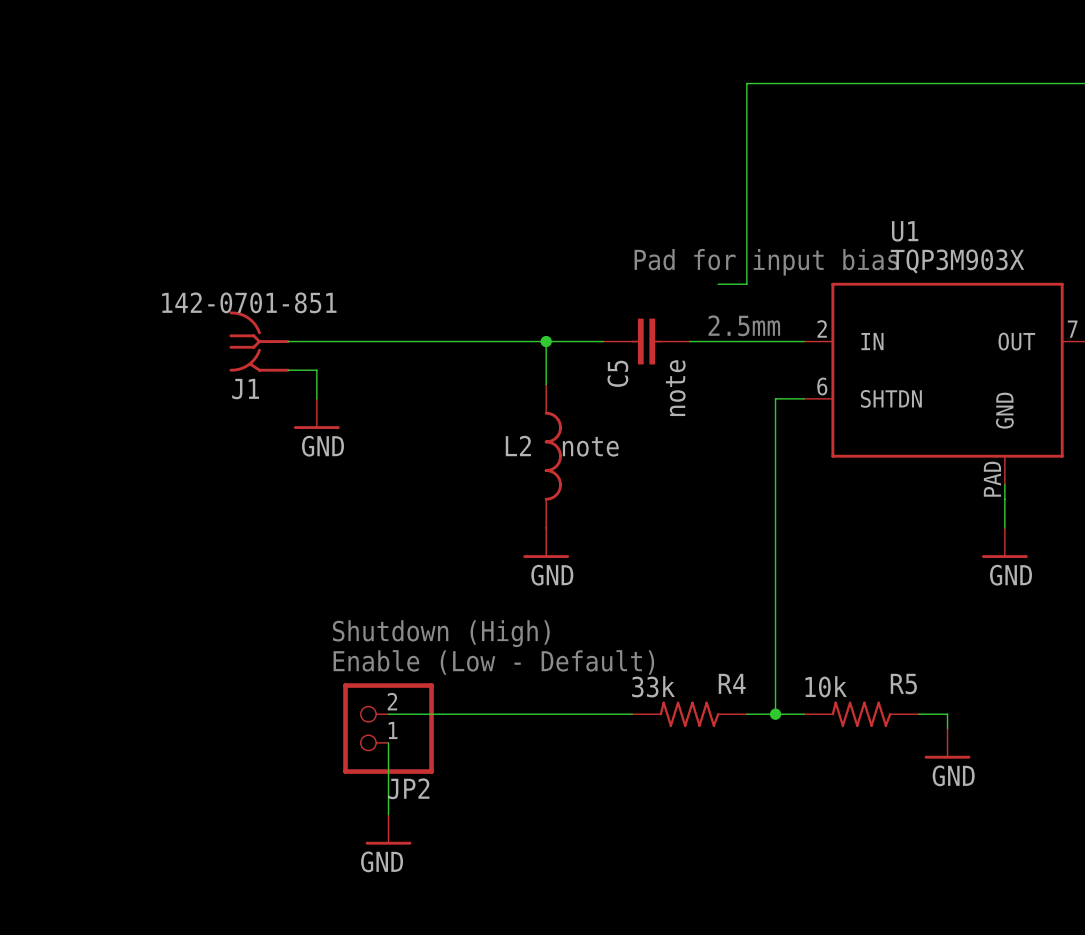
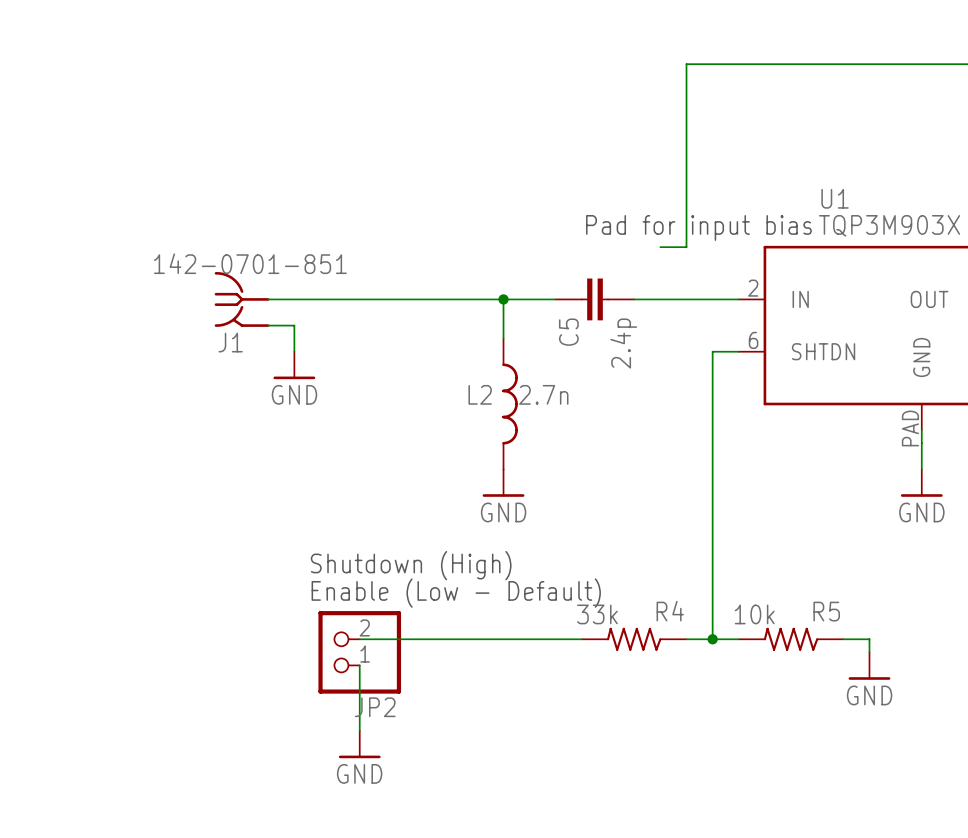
text: 2.5mm (744, 325) -> none
C5 value: note (675, 388) -> 2.4p (623, 343)
L2 value: note (590, 446) -> 2.7n (543, 394)

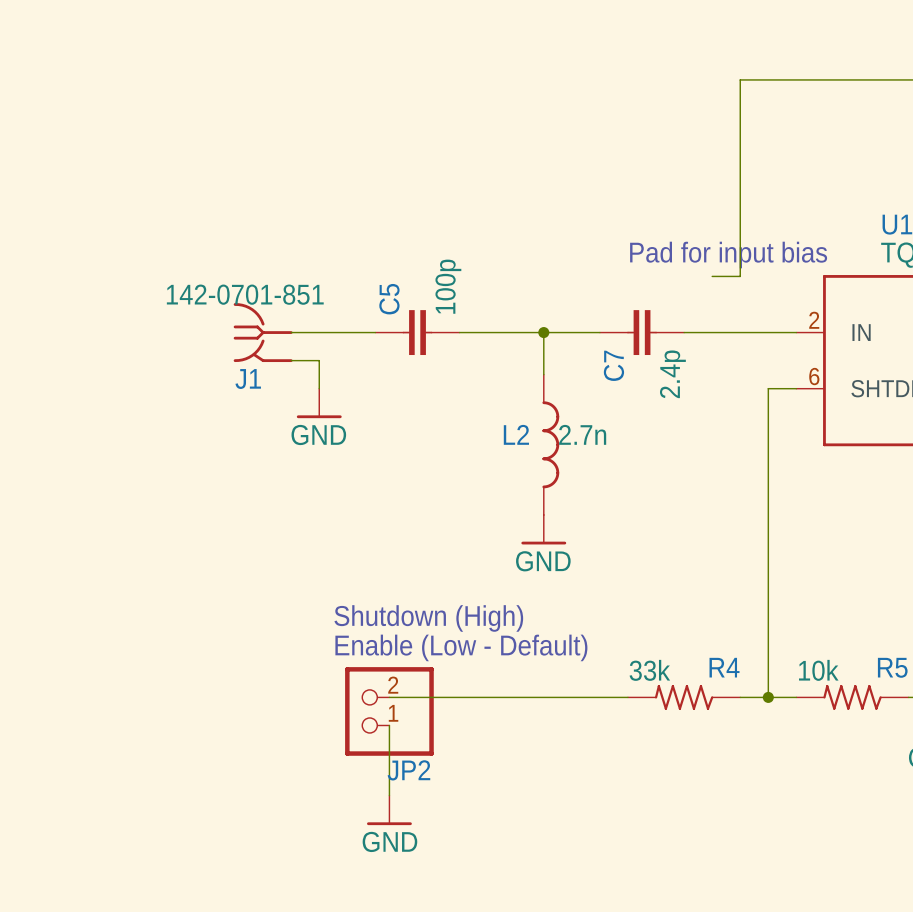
C5: none -> 100p (417, 332)
C5 name: C5 (568, 332) -> C7 (613, 365)

